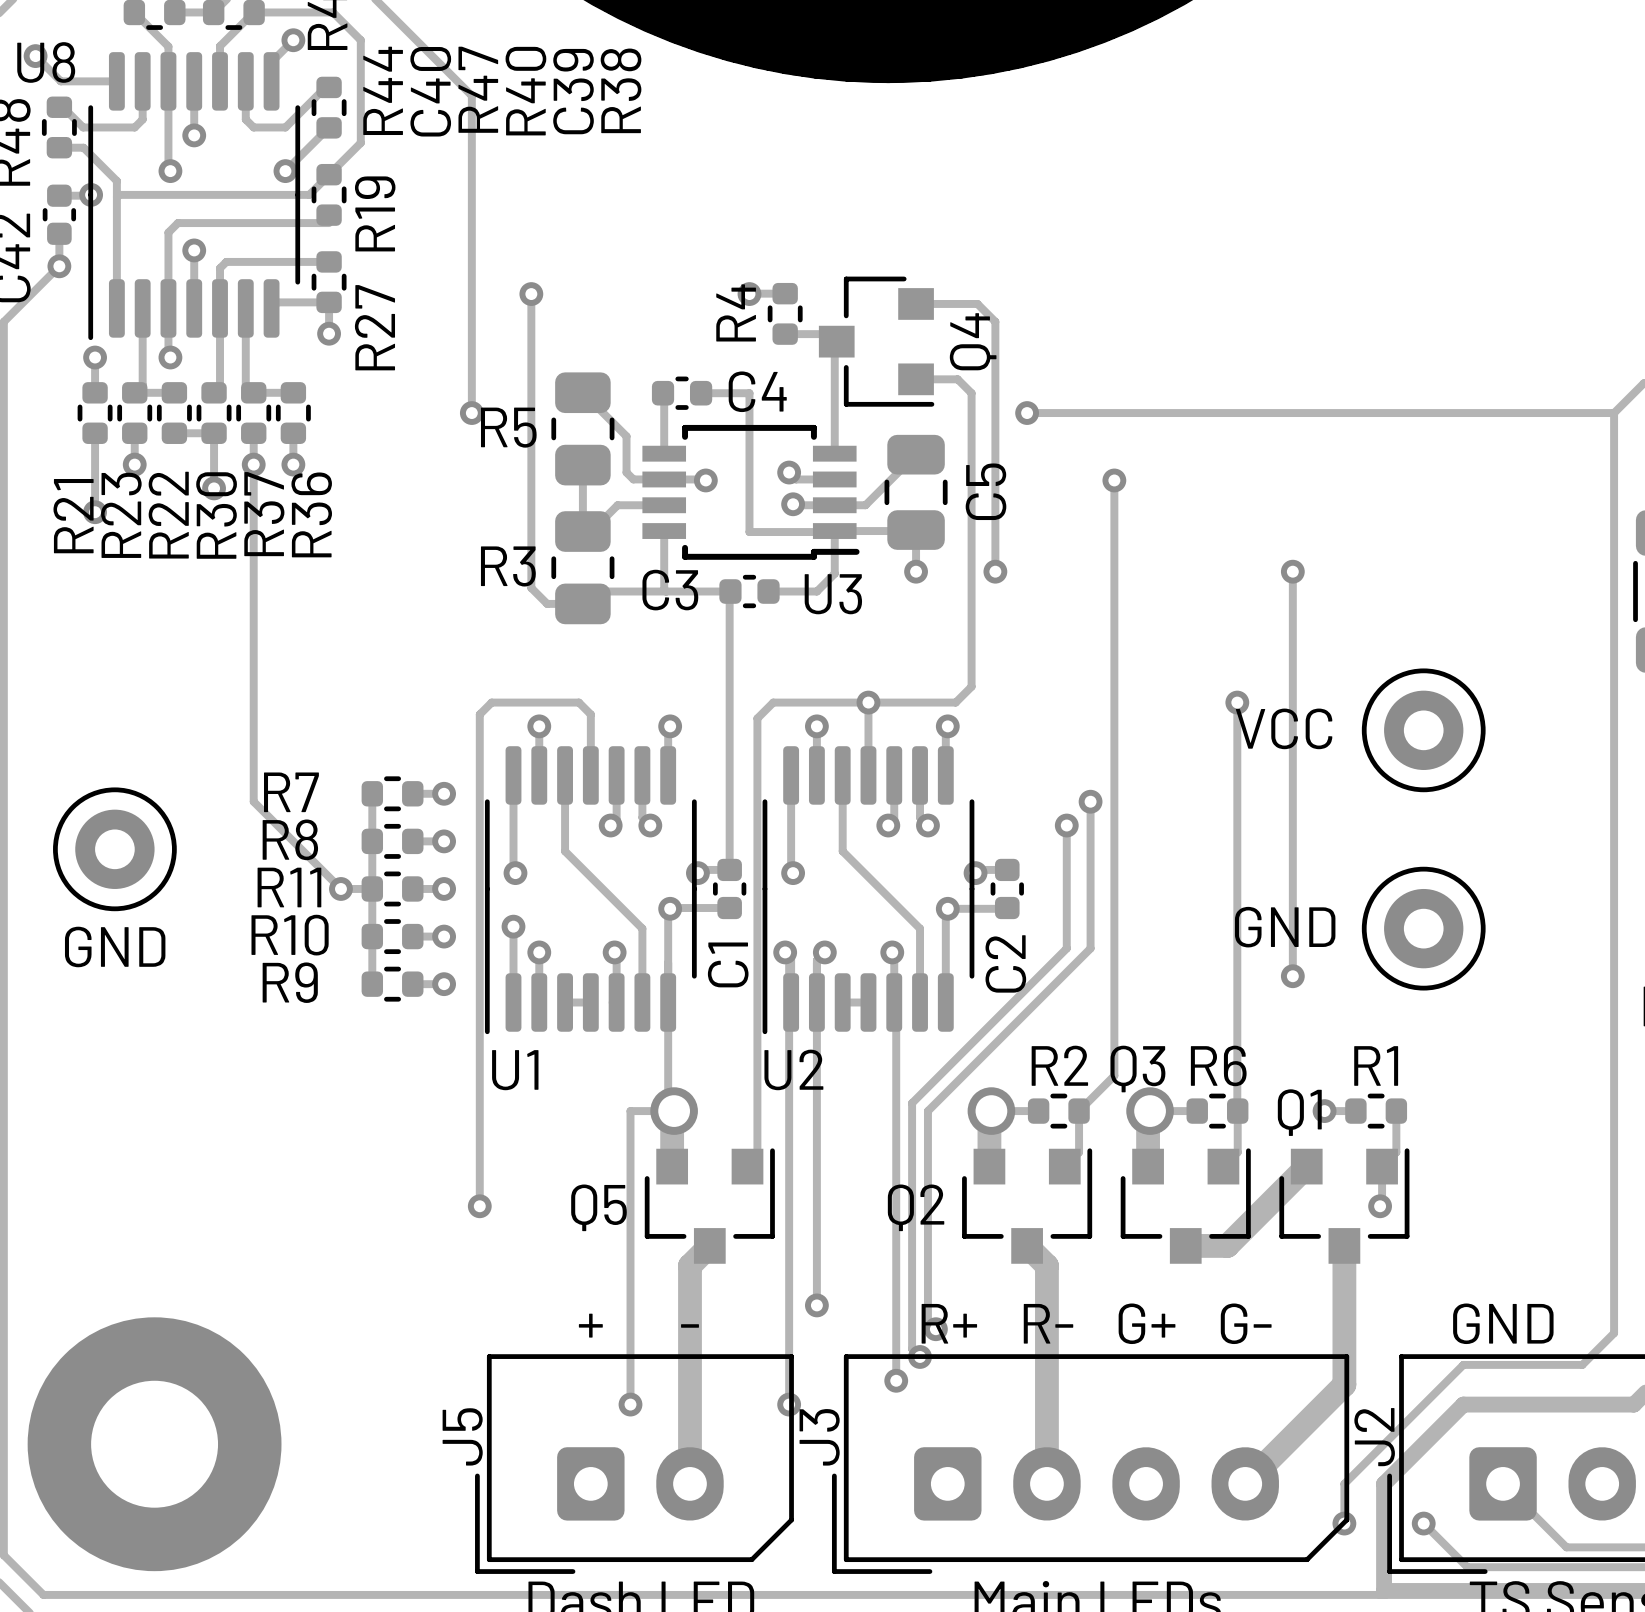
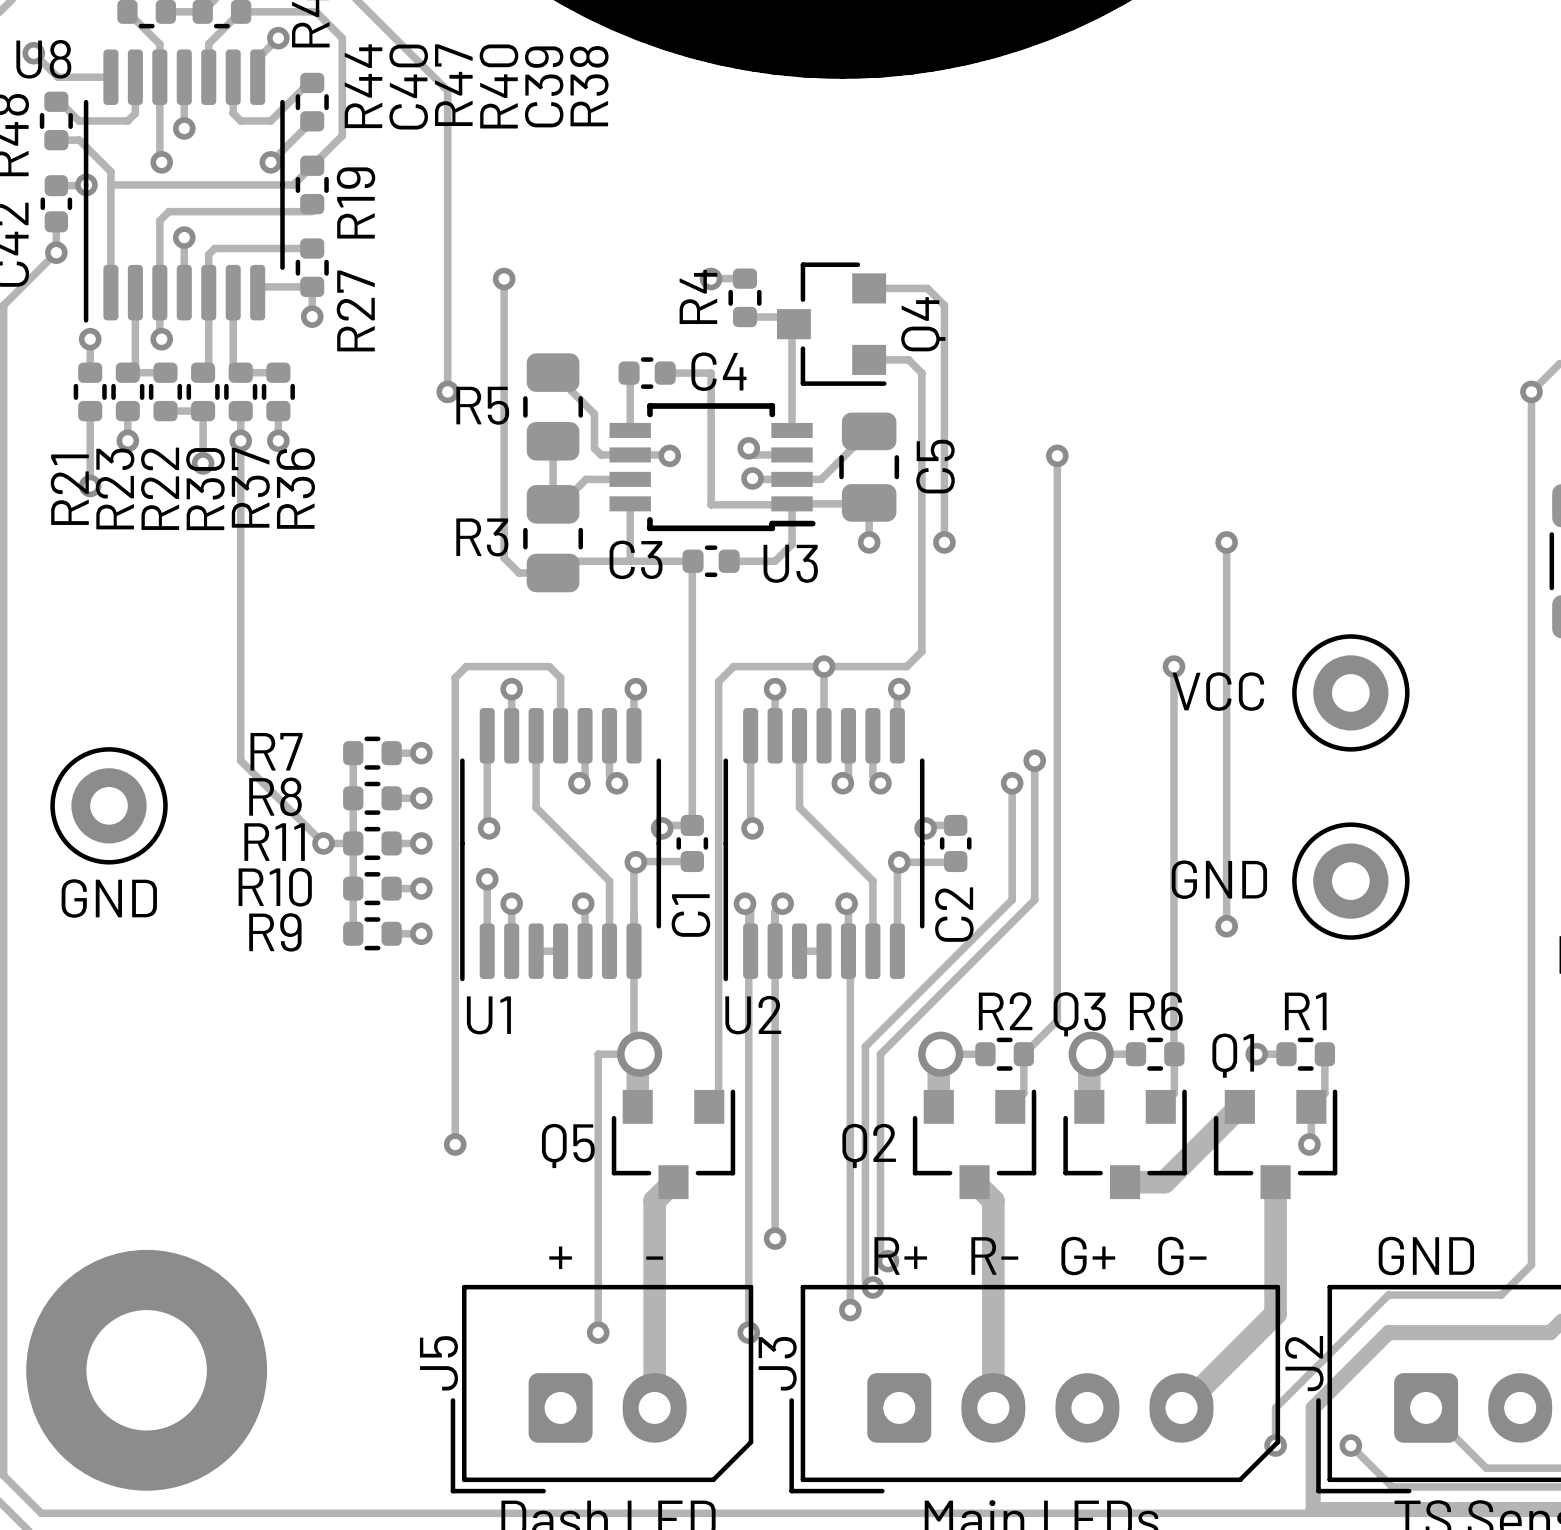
track: (1027, 413) (1614, 413) -> none
via: (1027, 413) -> none
via: none -> (1531, 391)

